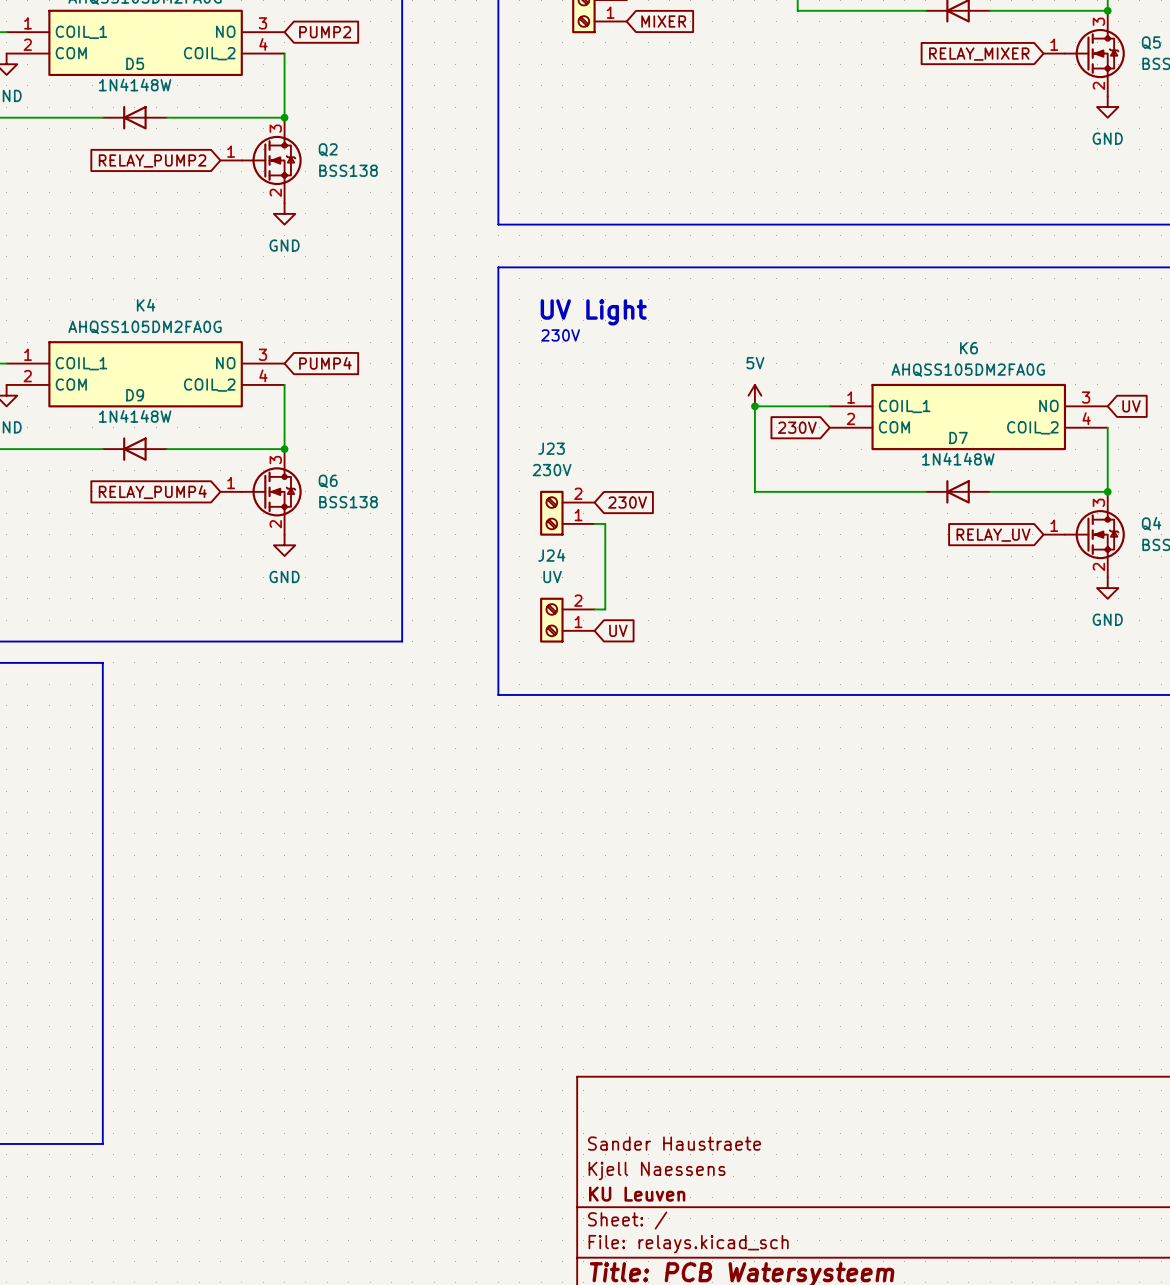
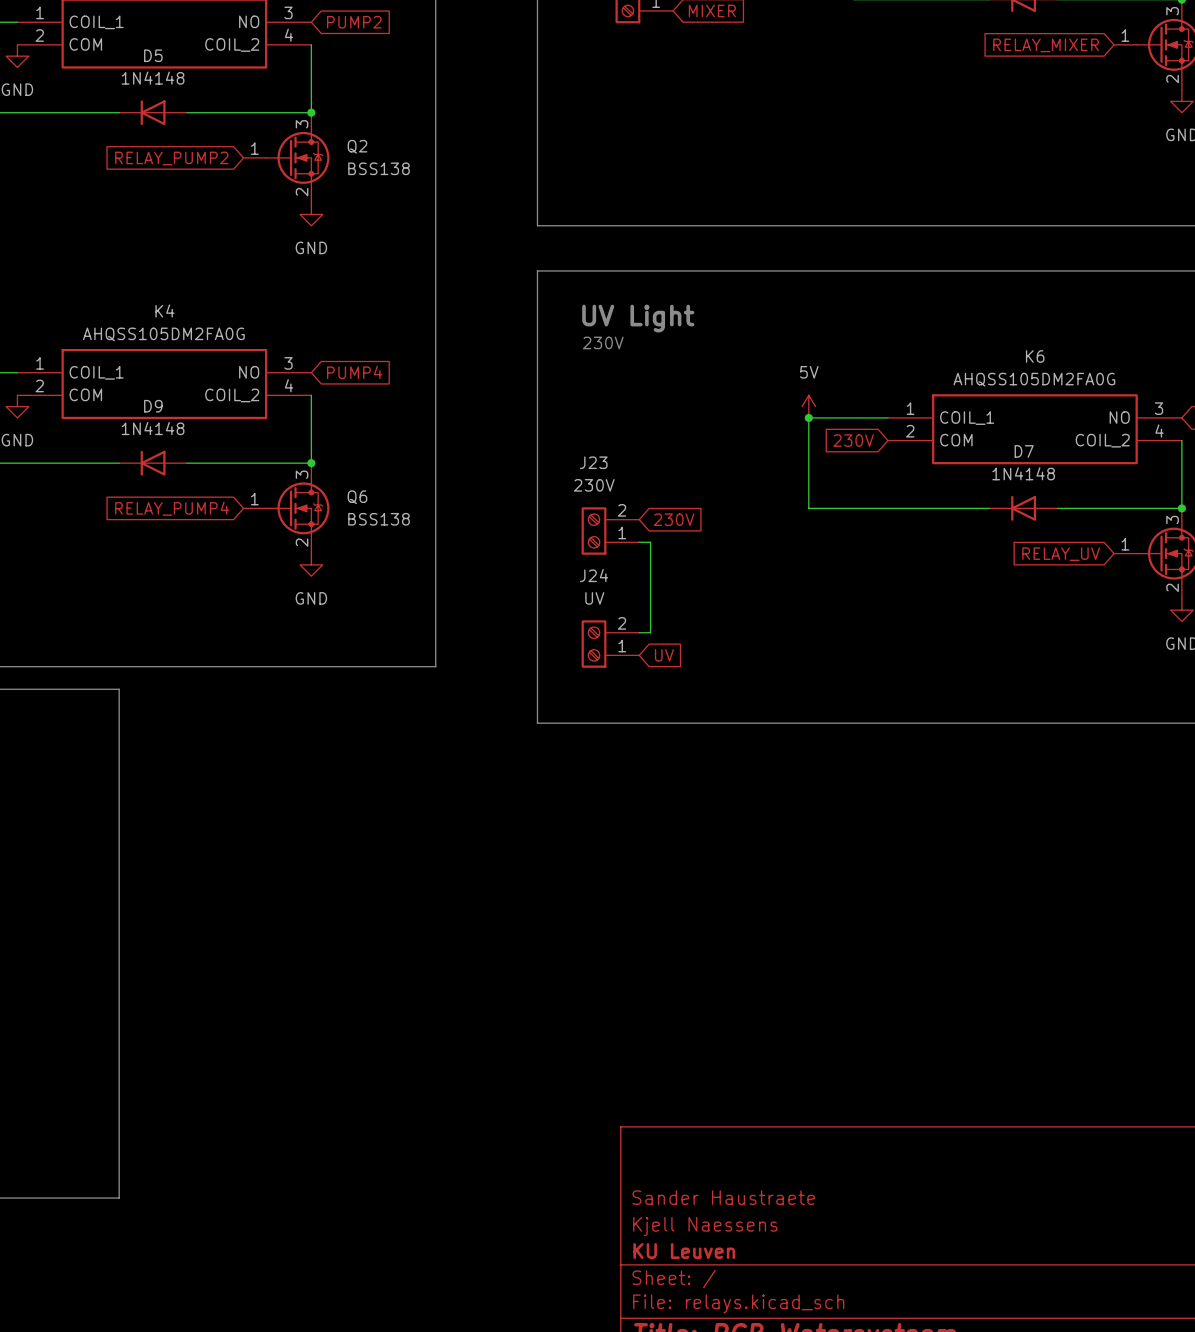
D5 value: 1N4148W (135, 84) -> 1N4148 (153, 78)
D9 value: 1N4148W (135, 416) -> 1N4148 (153, 428)
D7 value: 1N4148W (958, 459) -> 1N4148 (1023, 473)

